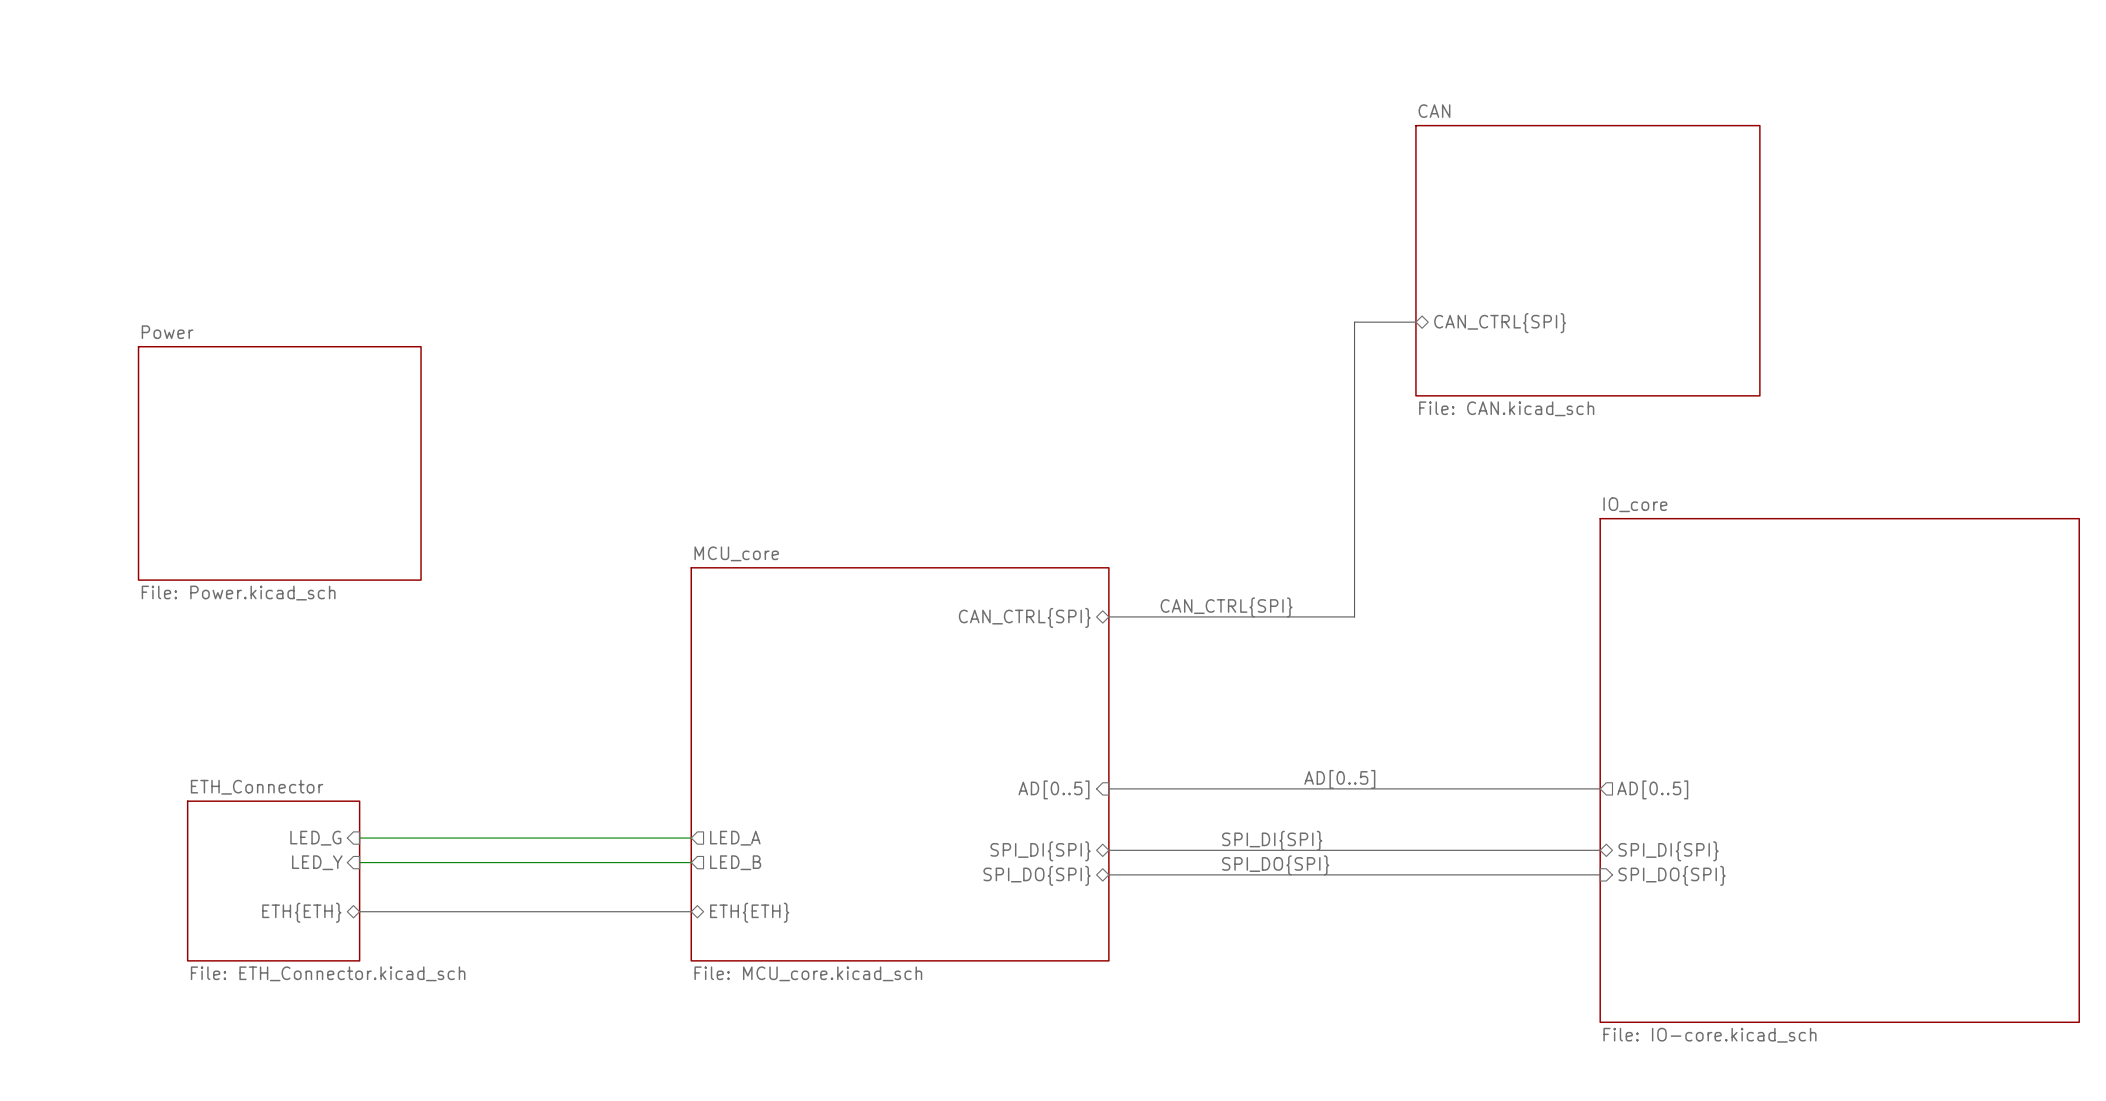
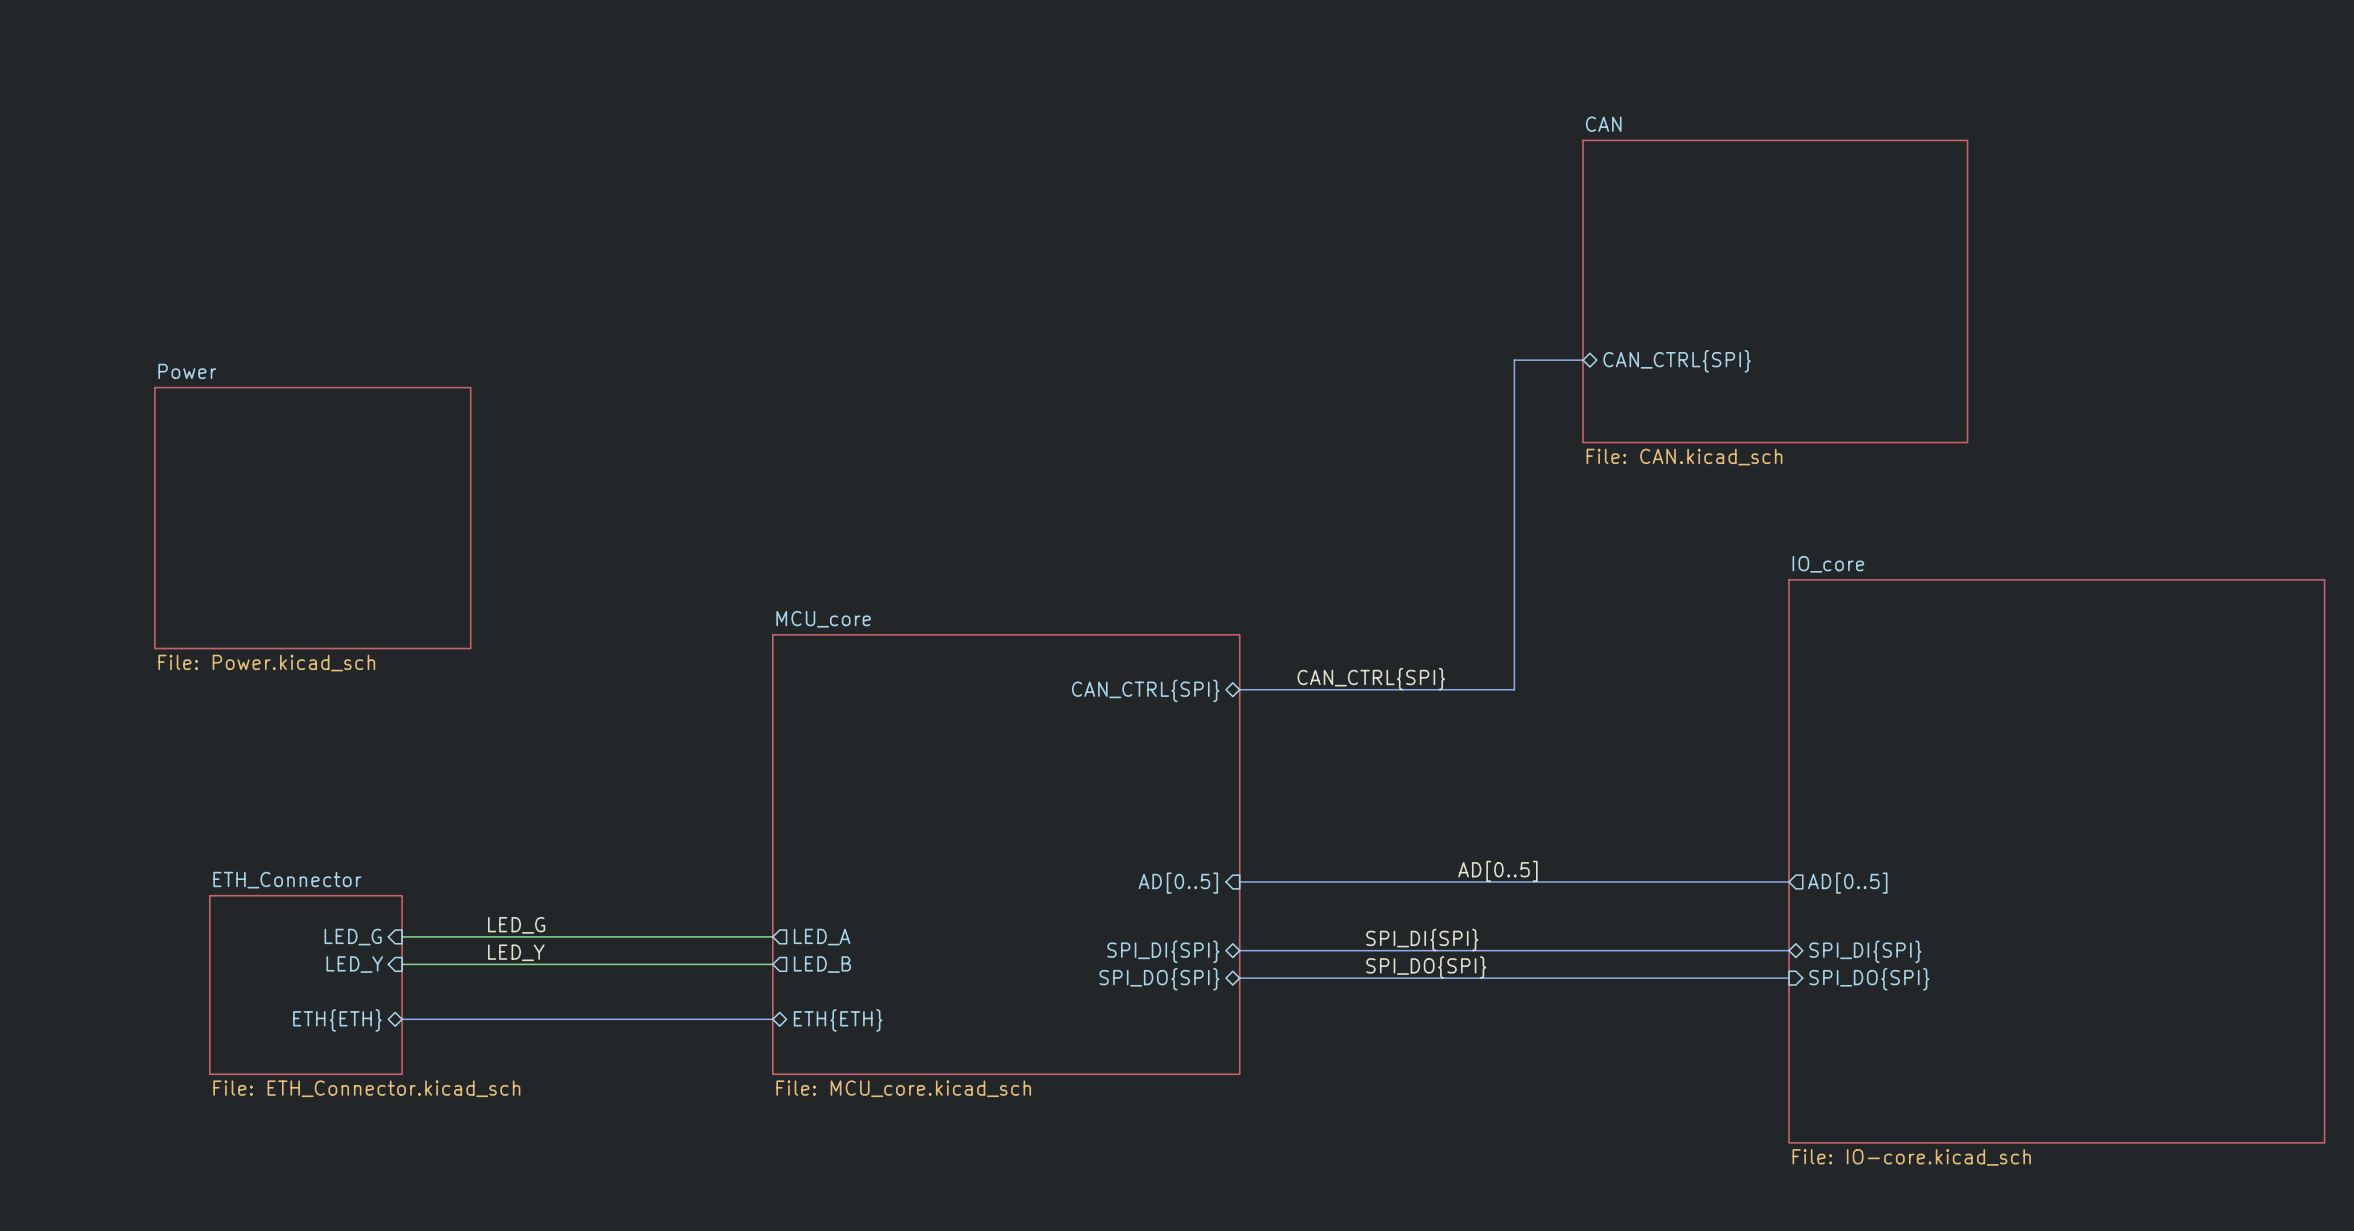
label: none -> LED_G (516, 925)
label: none -> LED_Y (516, 952)

